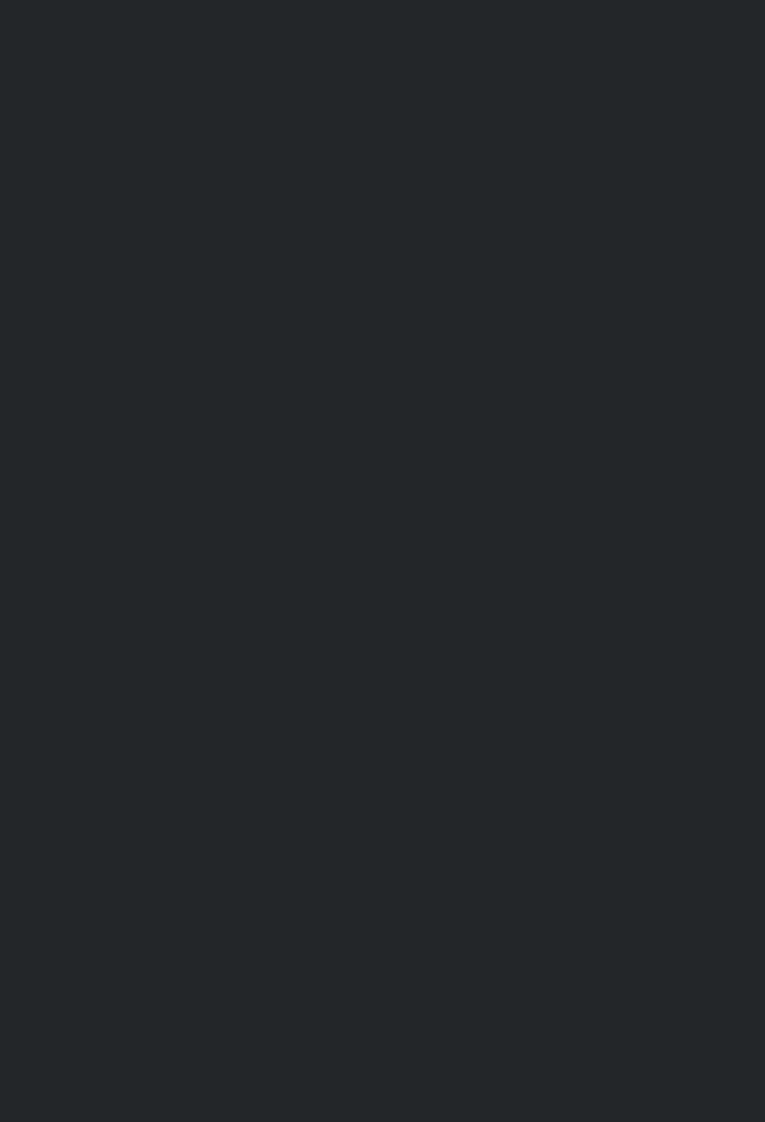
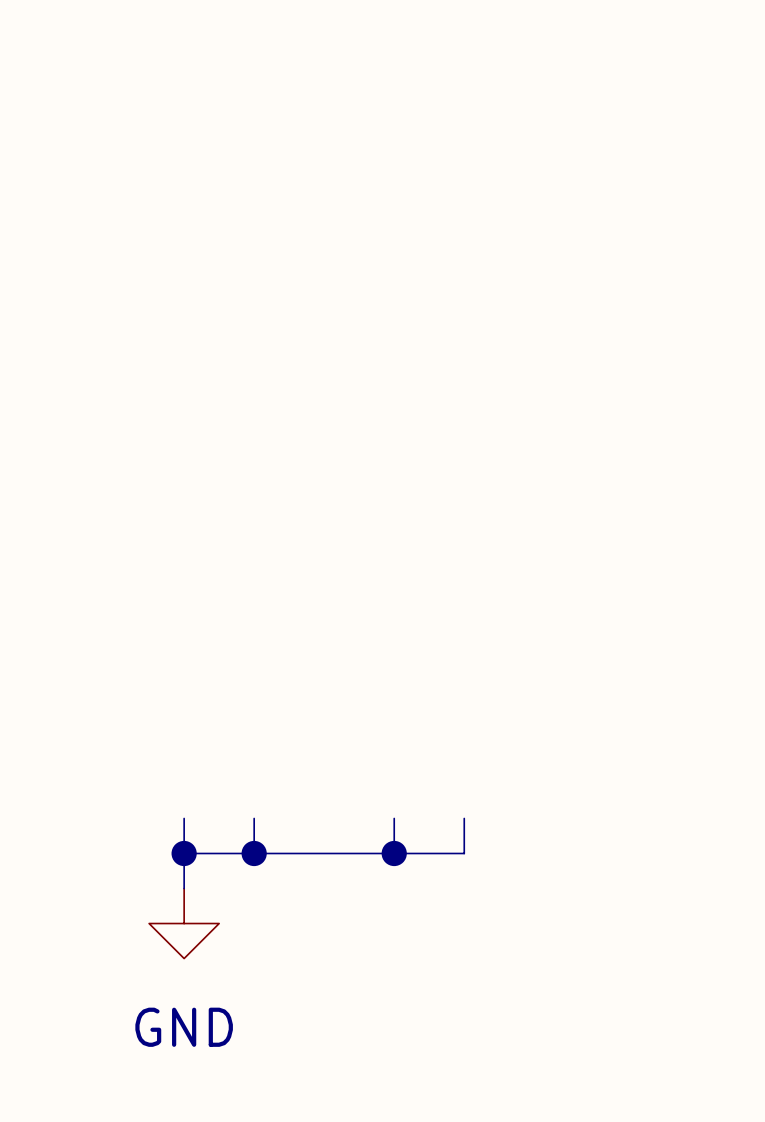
wire: none -> (184, 818) (184, 888)
wire: none -> (254, 818) (254, 853)
wire: none -> (394, 818) (394, 853)
wire: none -> (464, 818) (464, 853) (184, 853)
junction: none -> (184, 853)
junction: none -> (254, 853)
junction: none -> (394, 853)
power symbol: none -> GND (184, 923)

